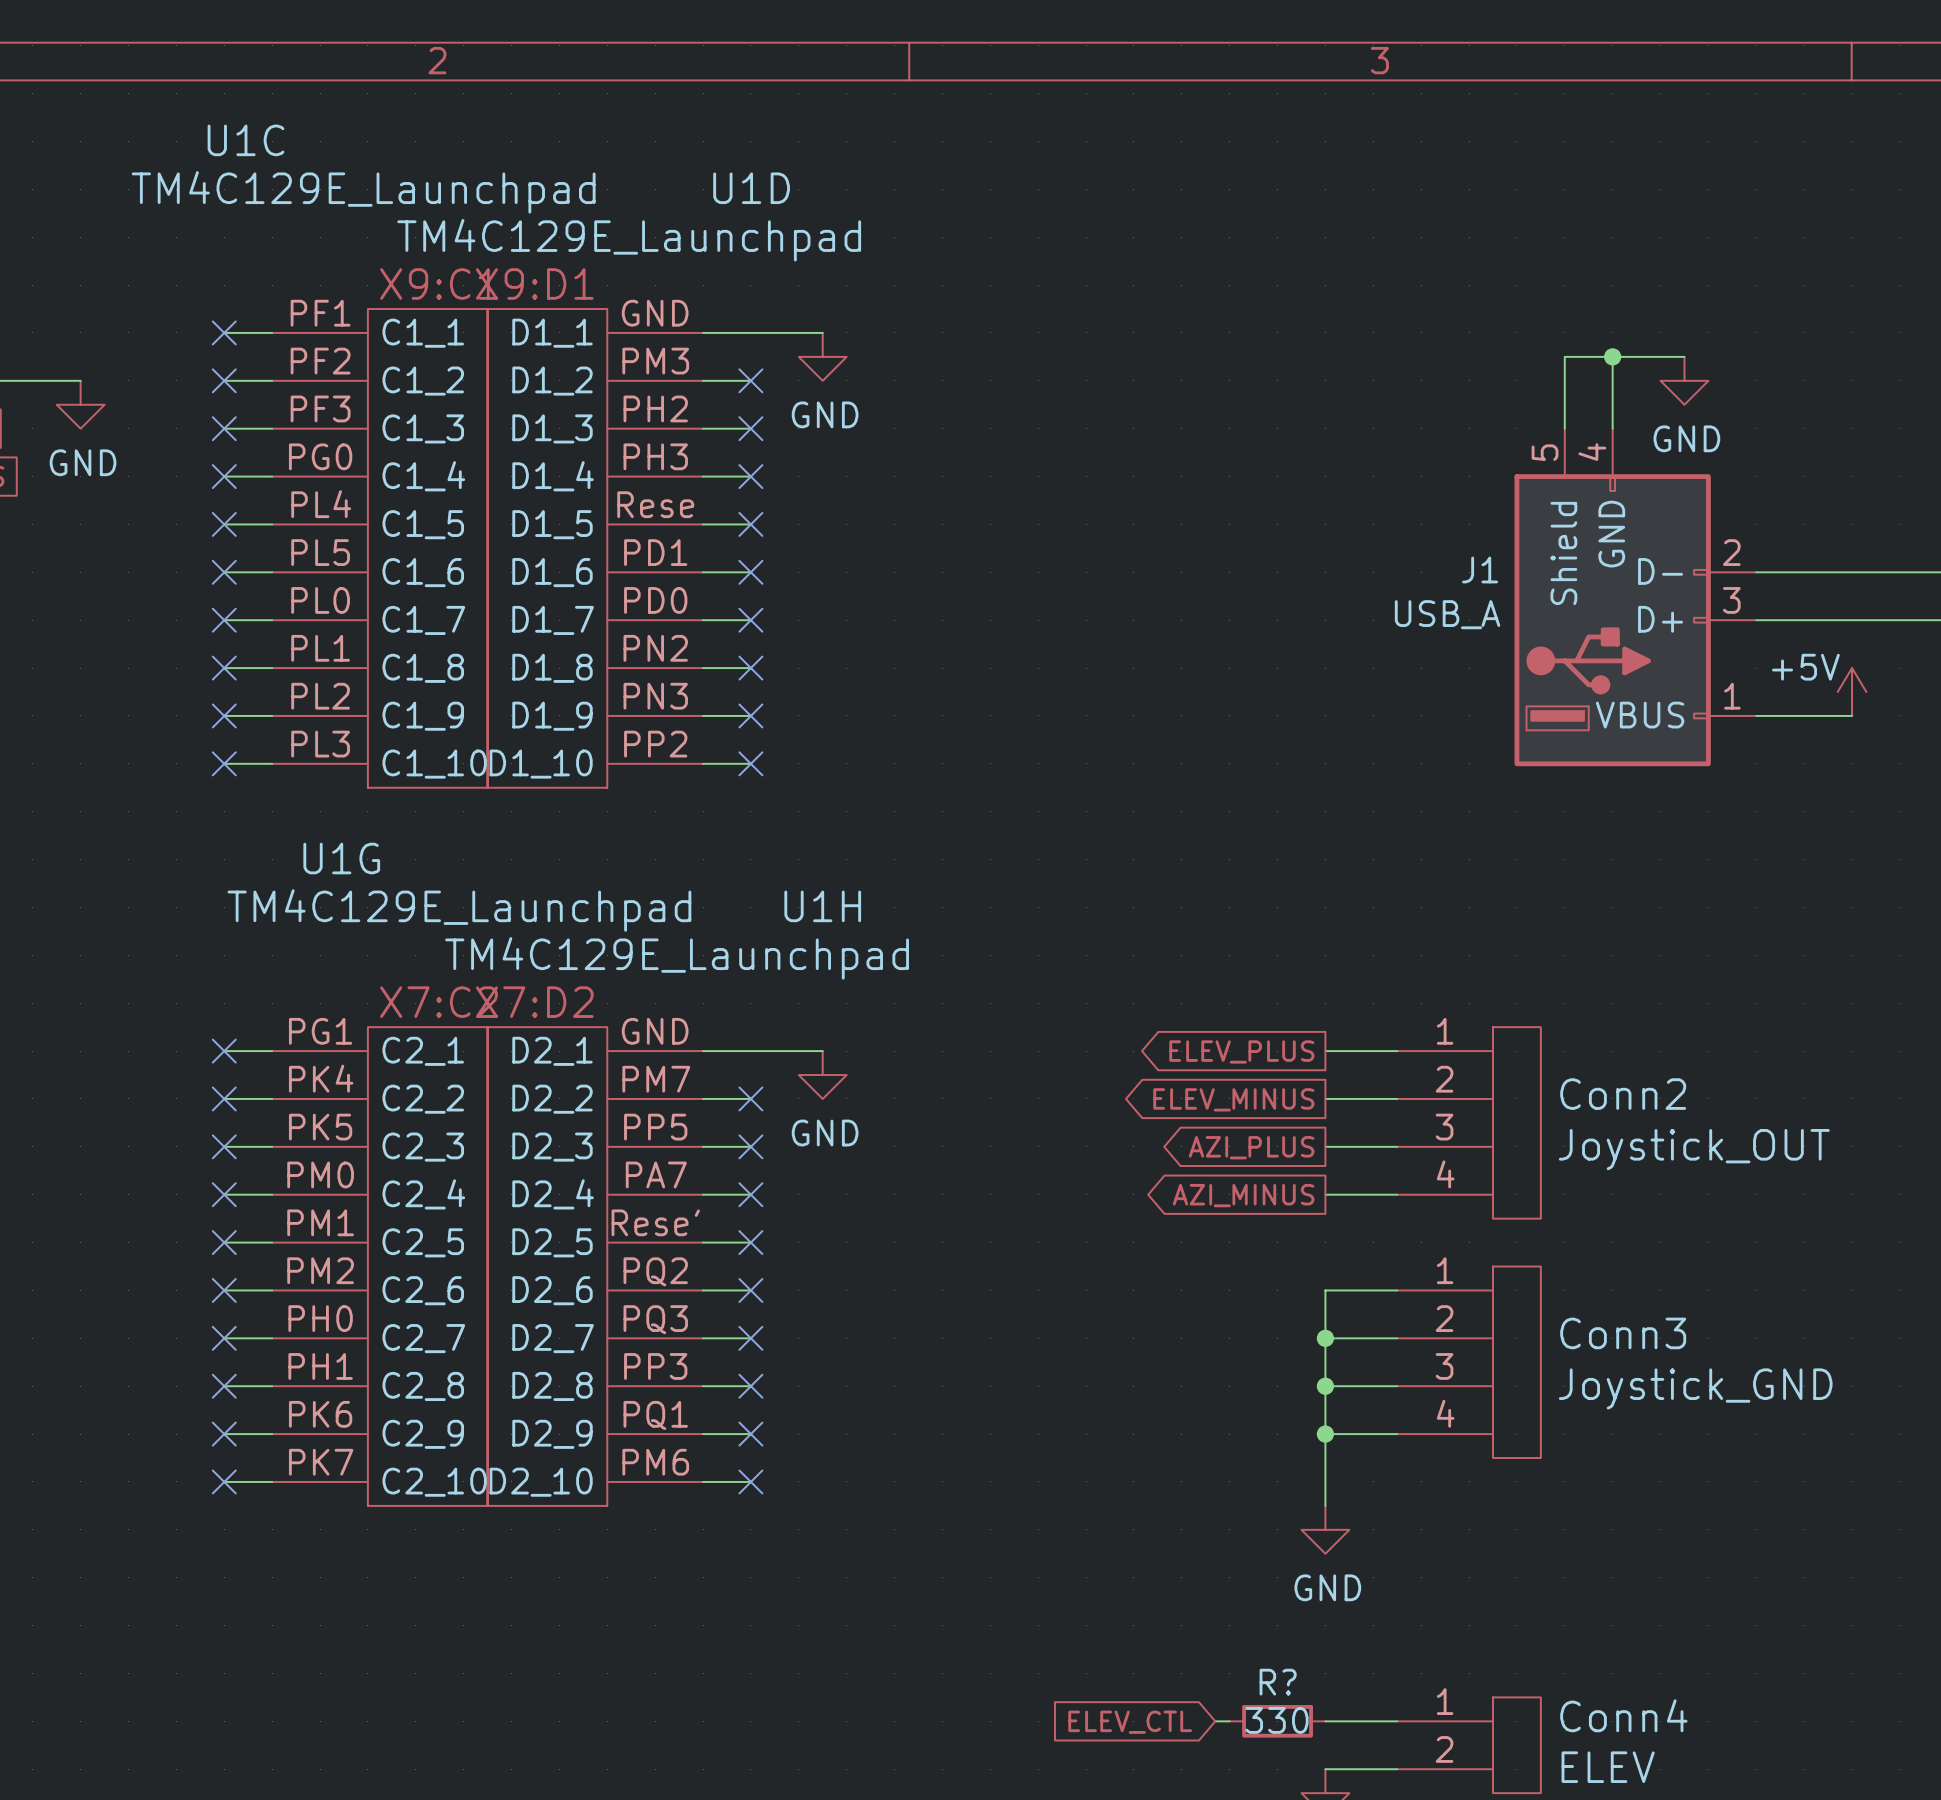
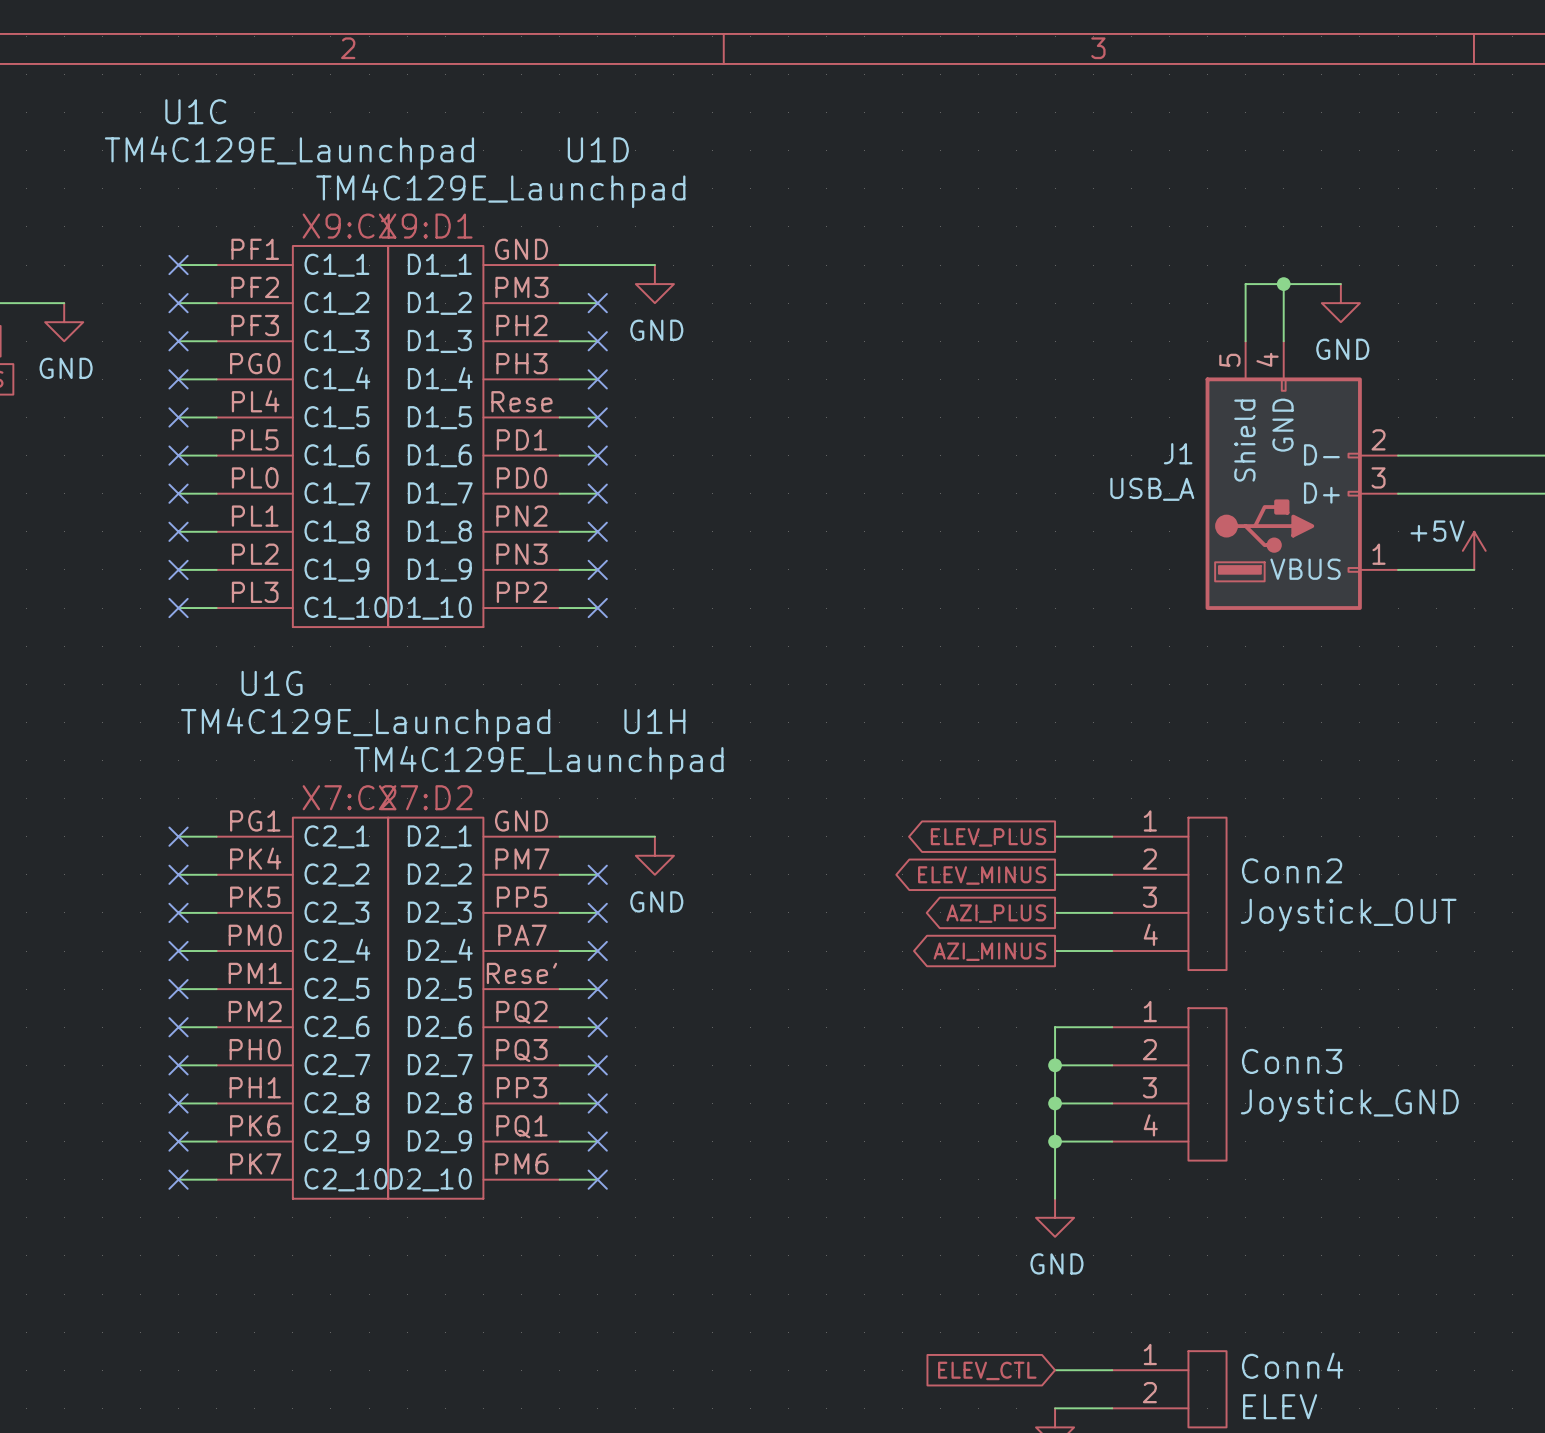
wire: (1215, 1721) (1229, 1721) -> none
R?: 330 (1277, 1721) -> none
global label position: ELEV_CTL (1130, 1722) -> ELEV_CTL (987, 1370)

